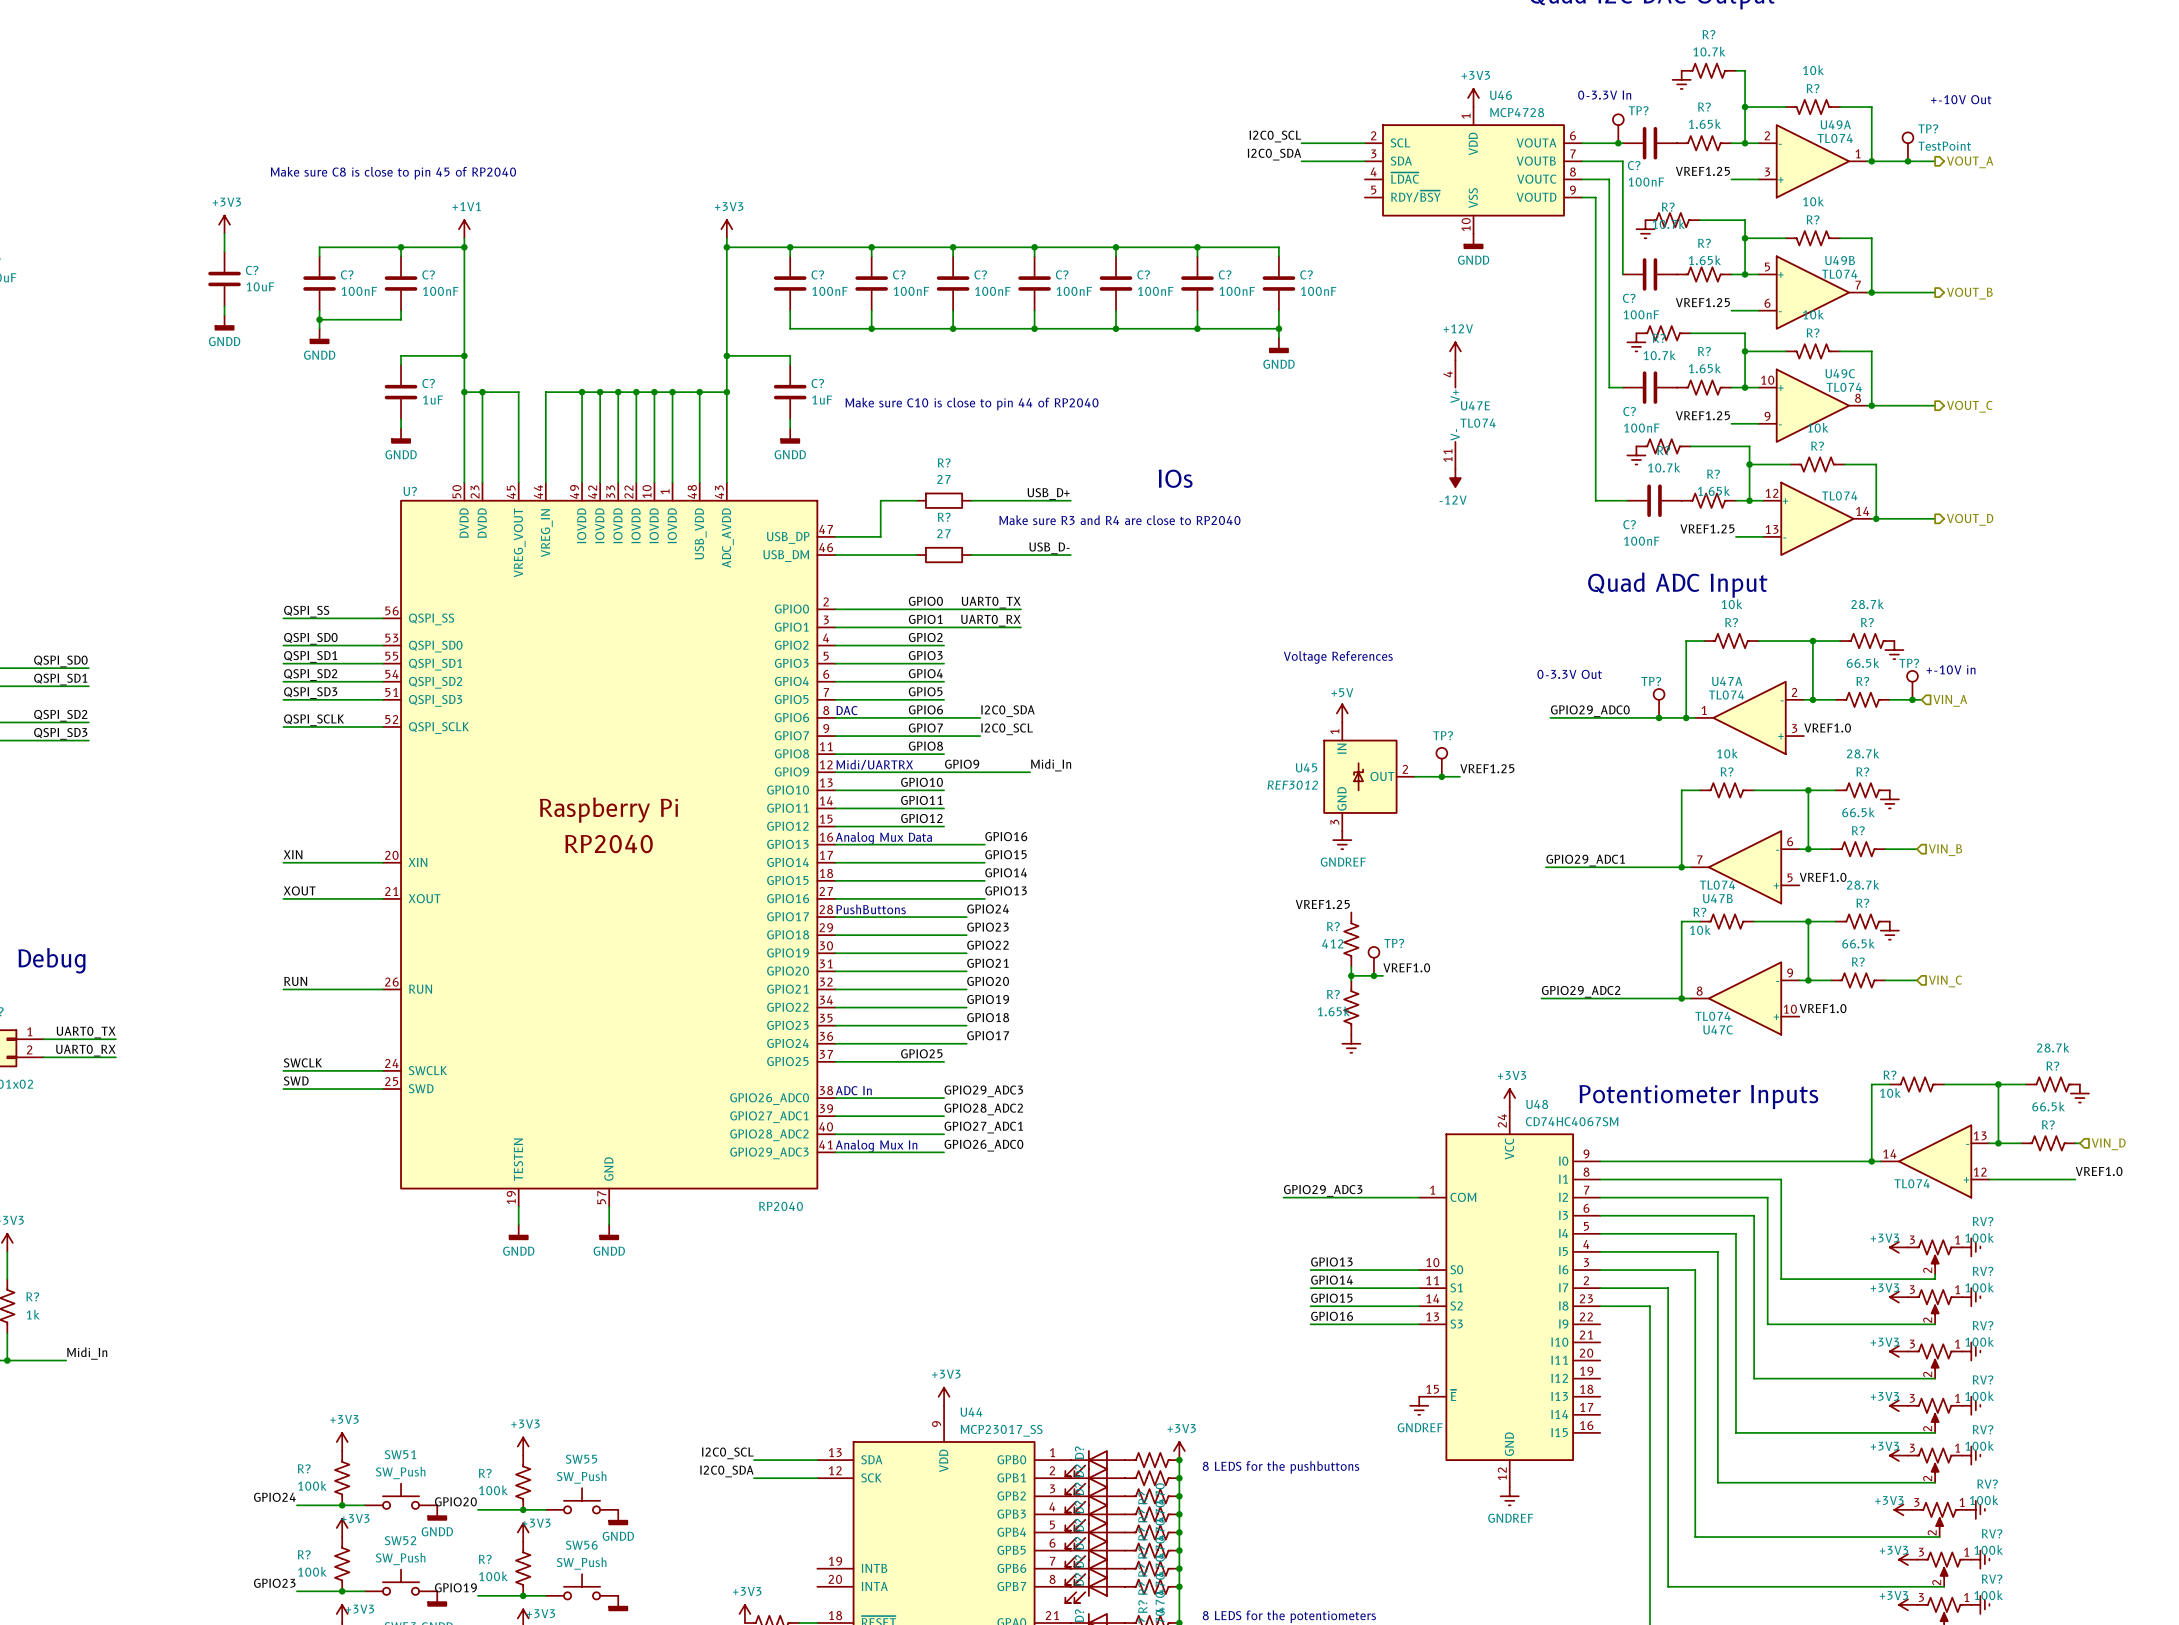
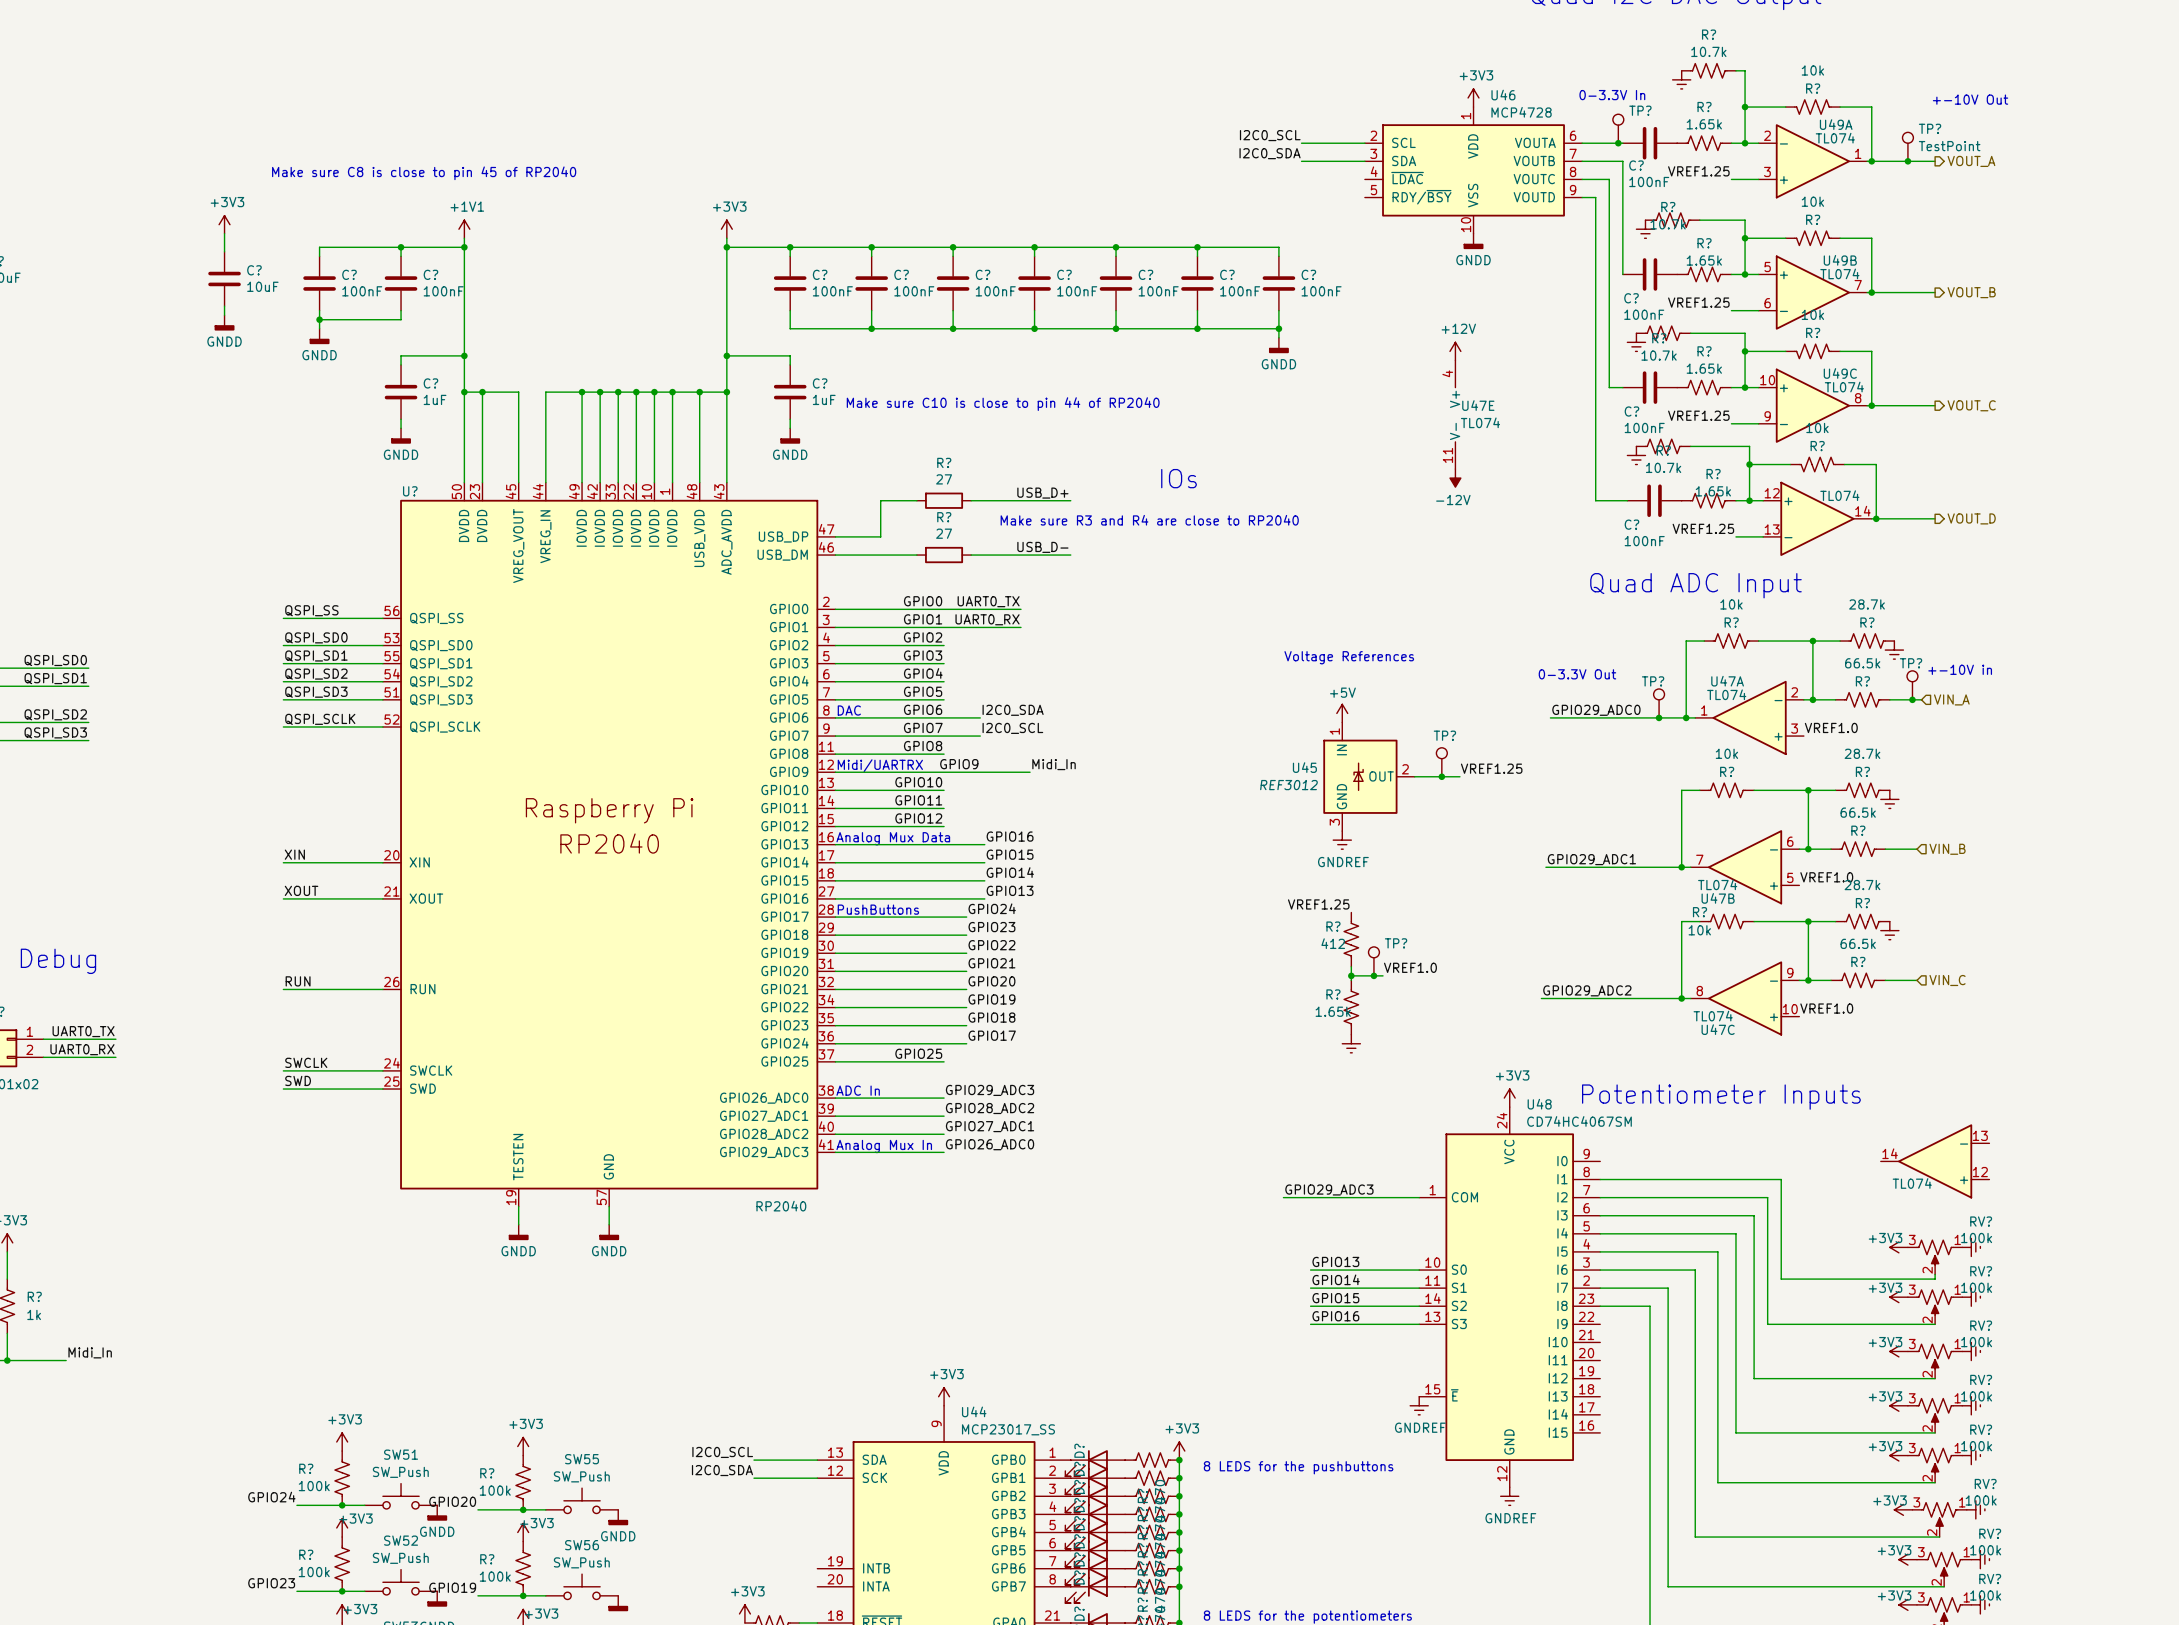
wire: (1889, 1084) (1871, 1084) (1871, 1161) -> none
R?: 10k (1917, 1084) -> none
wire: (1944, 1084) (2025, 1084) -> none
wire: (1998, 1084) (1998, 1143) -> none
junction: (1998, 1084) -> none
R?: 28.7k (2052, 1084) -> none
power symbol: (2079, 1093) -> none
wire: (1989, 1143) (2021, 1143) -> none
junction: (1998, 1143) -> none
R?: 66.5k (2048, 1143) -> none
wire: (2075, 1143) (2079, 1143) -> none
hierarchical label: VIN_D (2108, 1144) -> none
wire: (1600, 1161) (1880, 1161) -> none
junction: (1871, 1161) -> none
label: VREF1.0 (2099, 1171) -> none
wire: (1989, 1179) (2075, 1179) -> none

